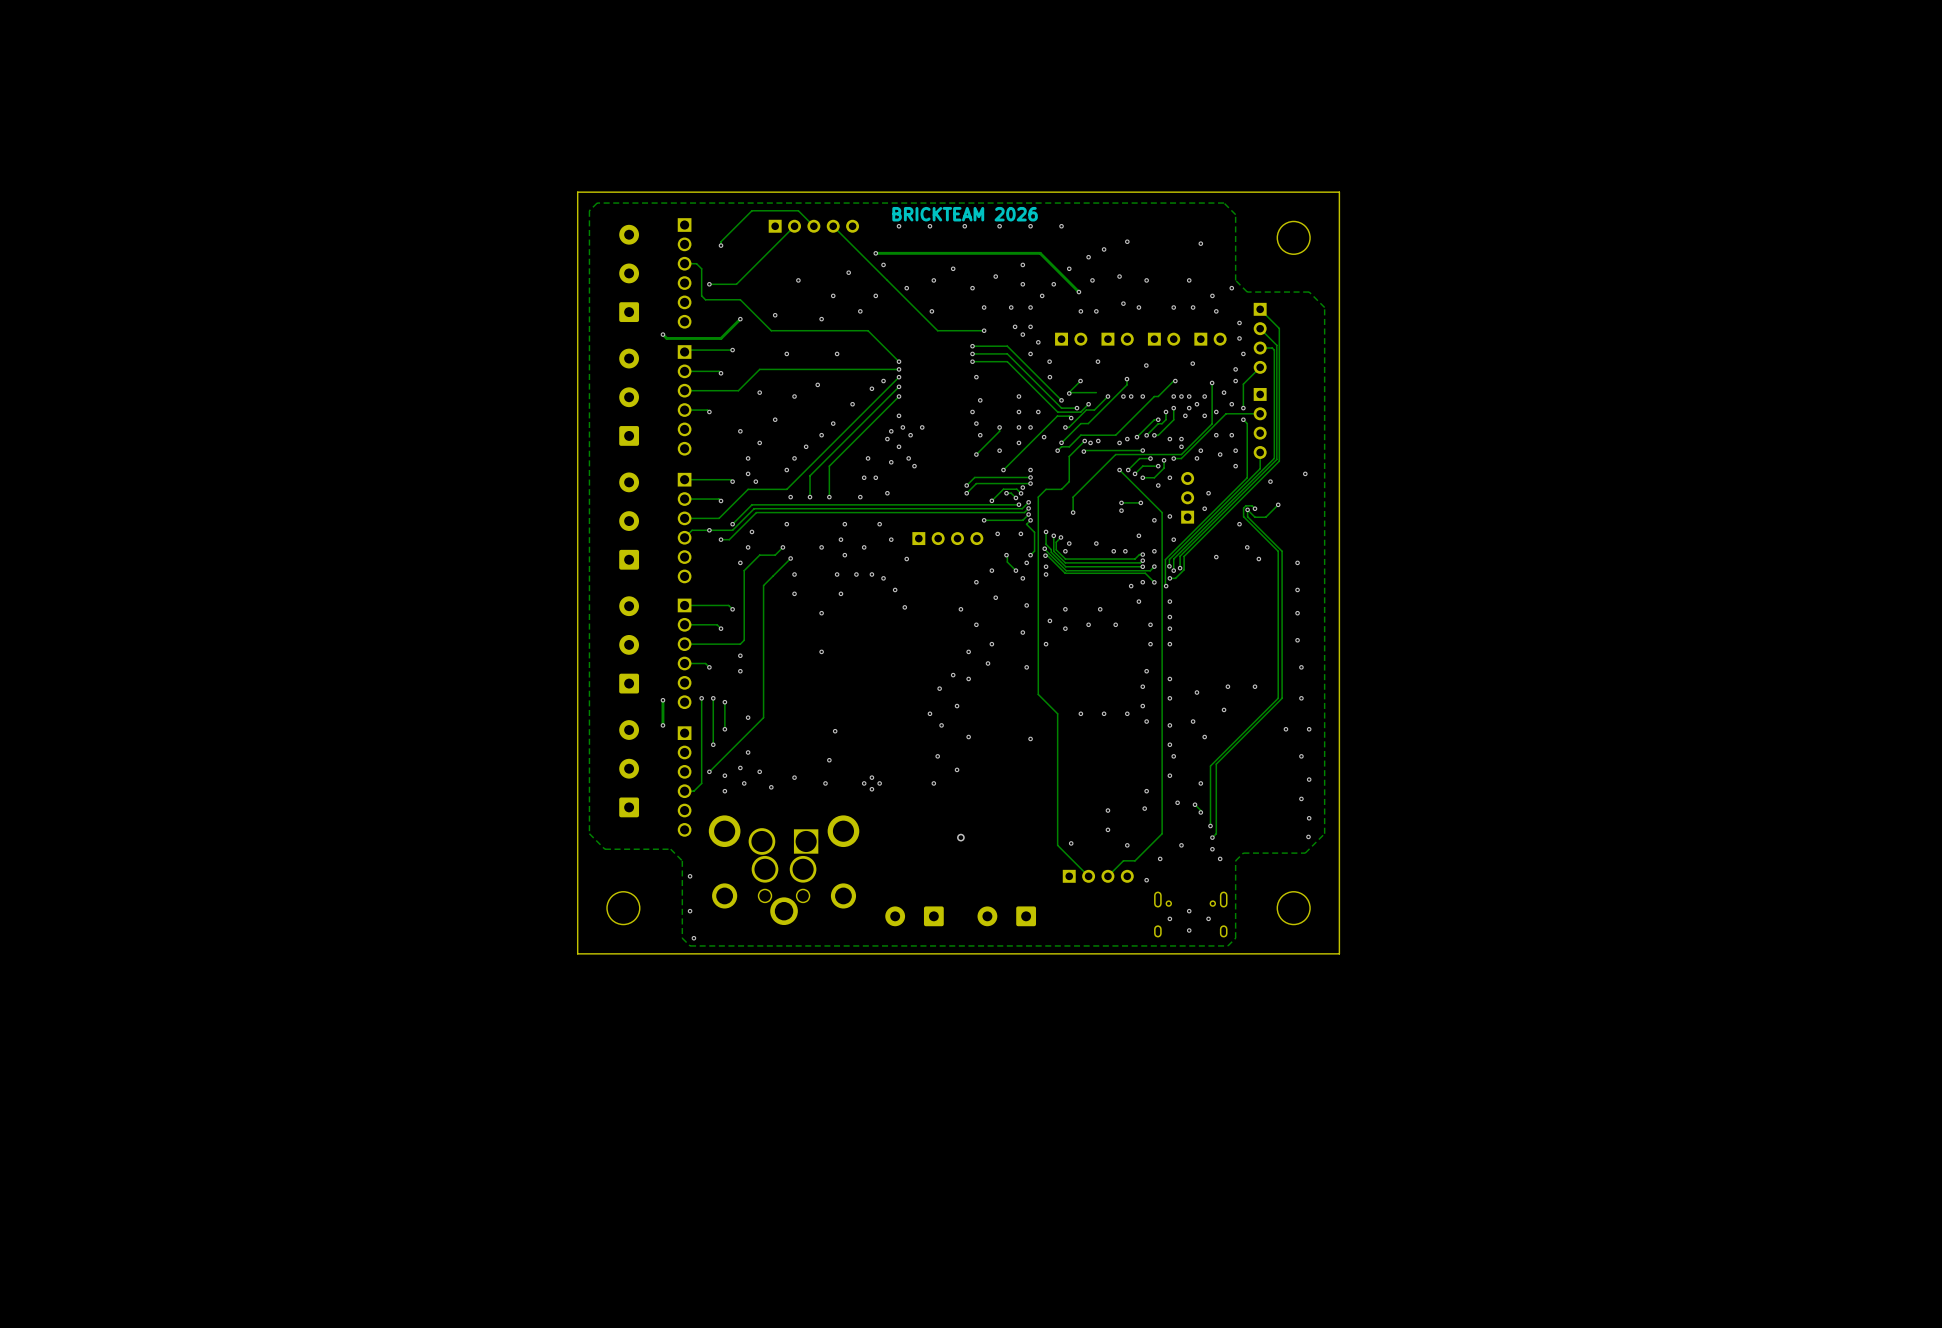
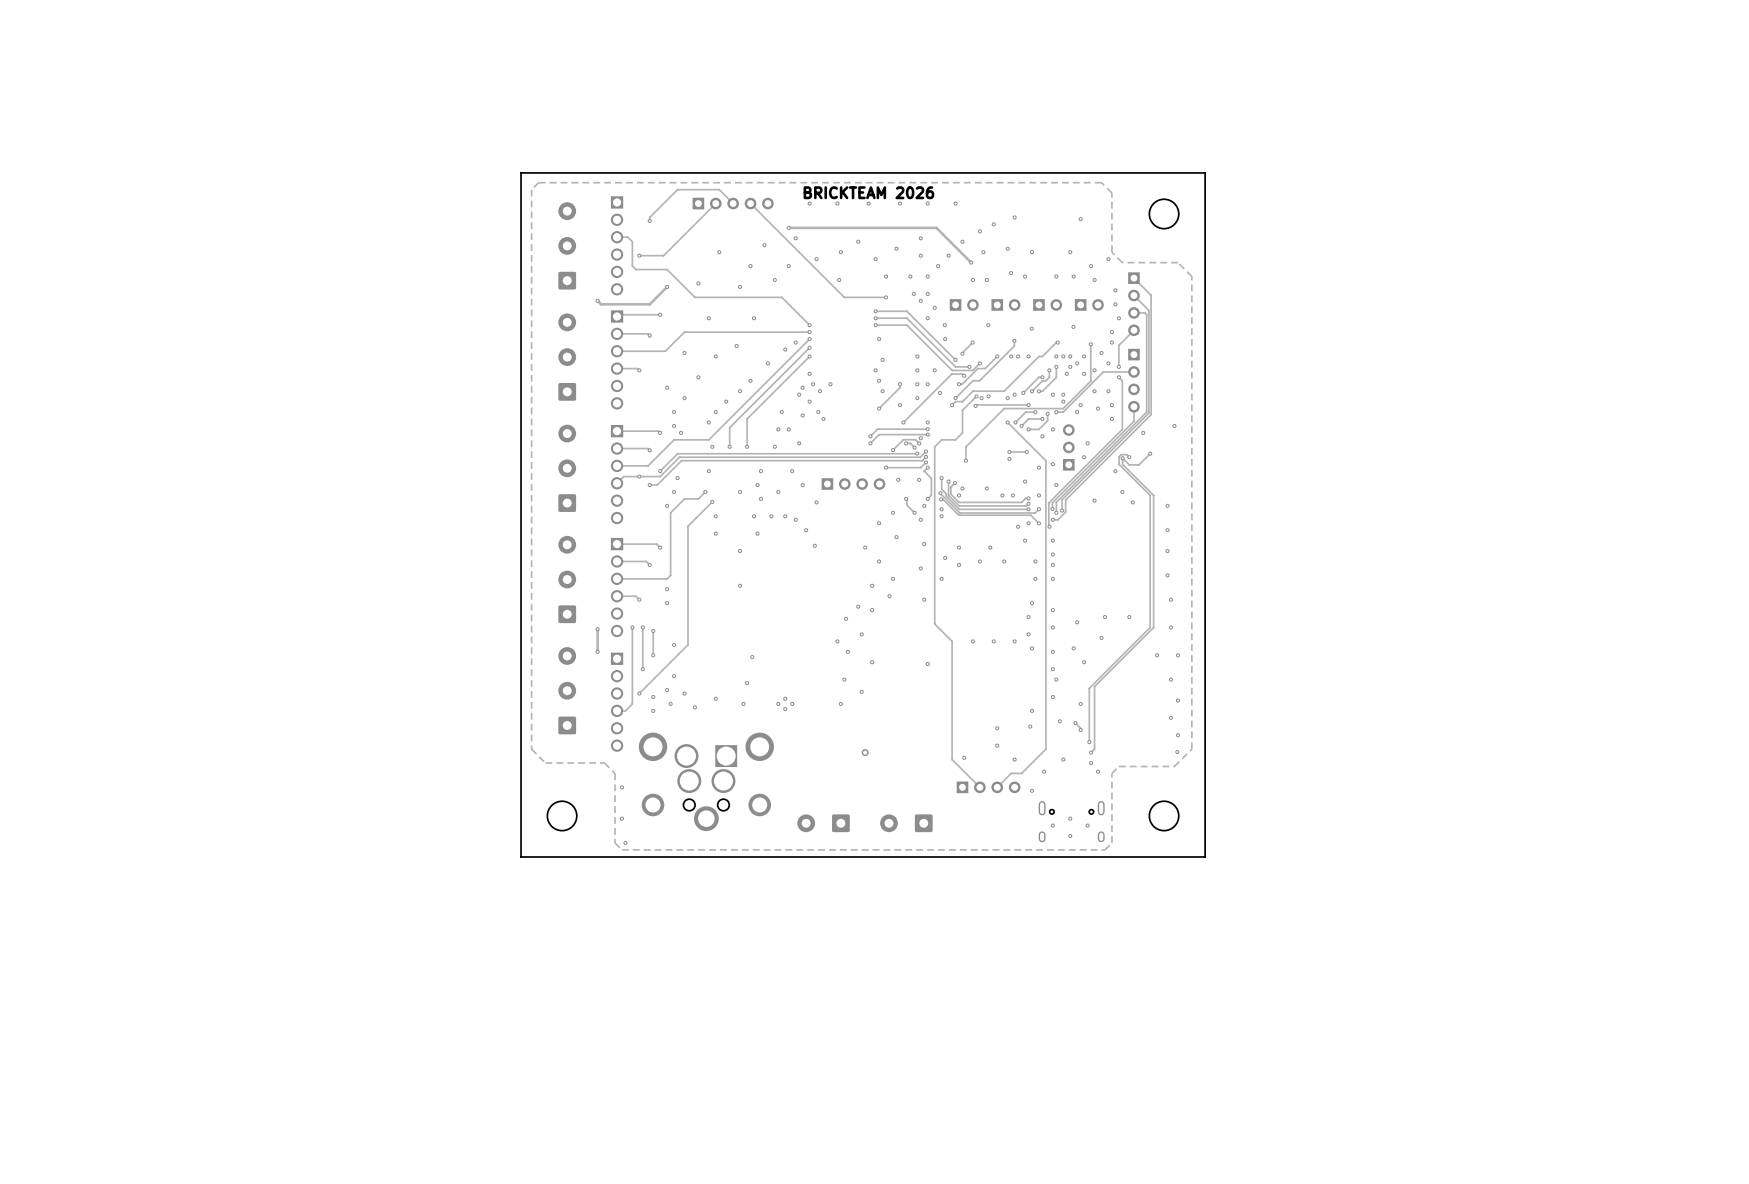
track: (1096, 392) (1069, 392) -> none

